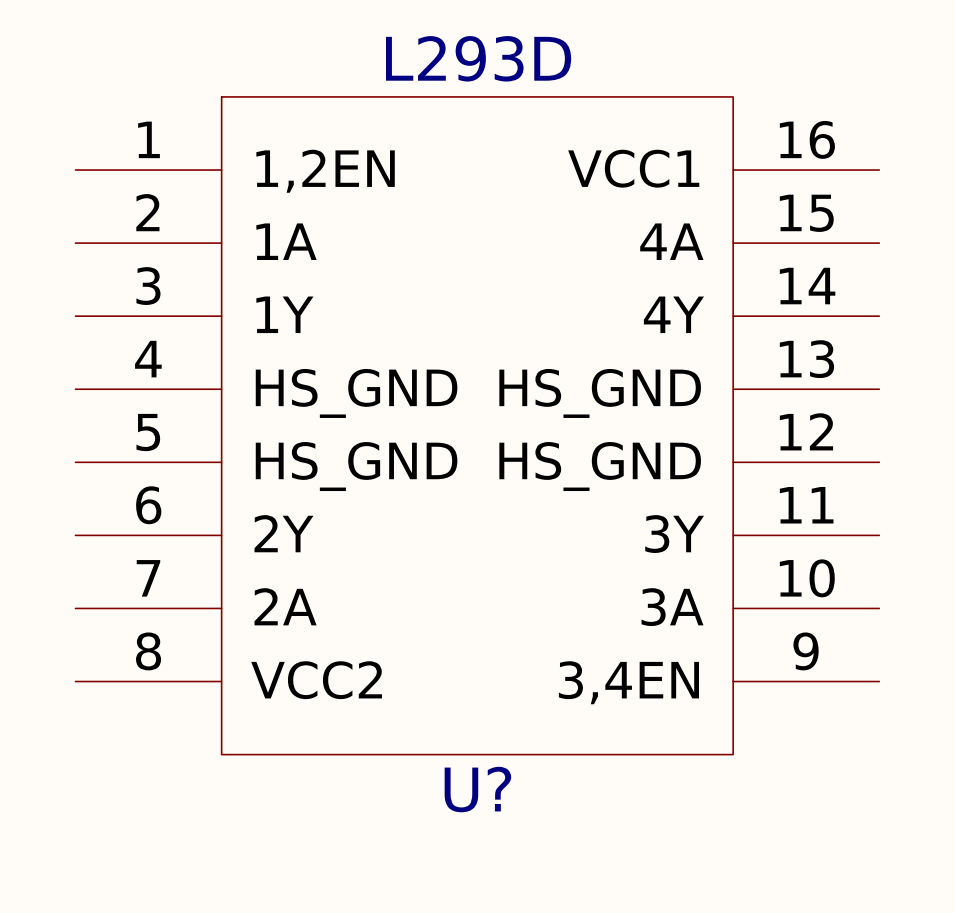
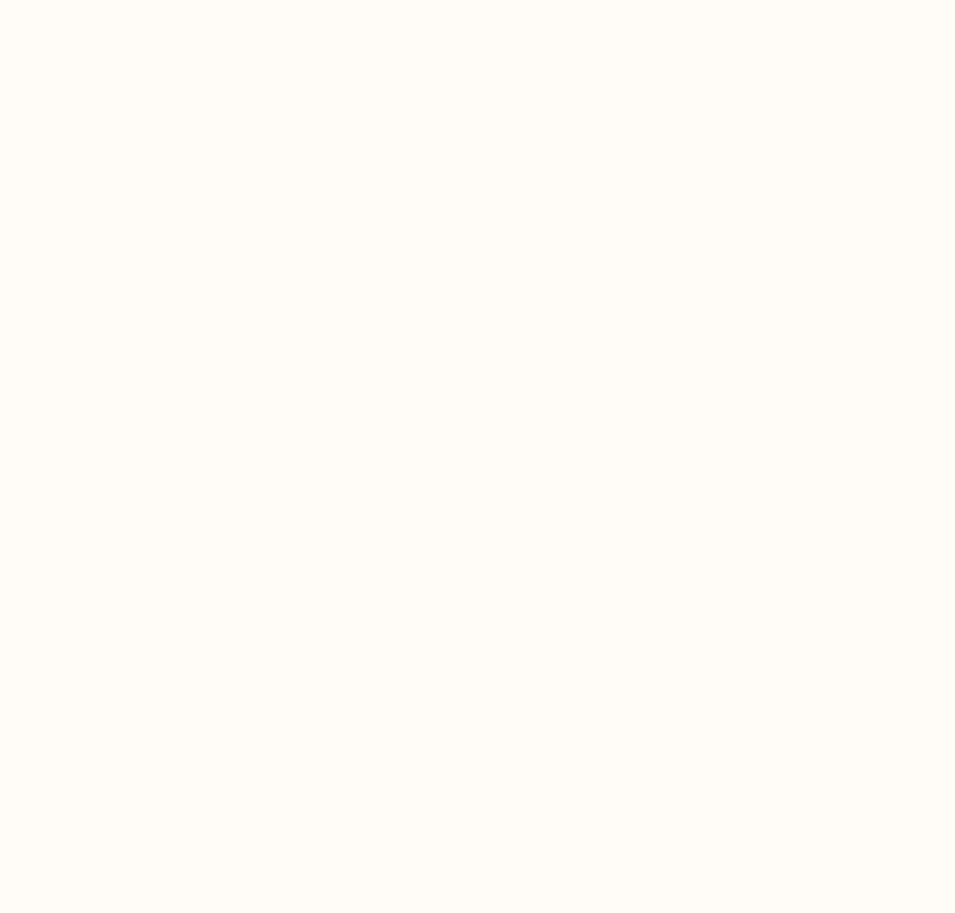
U?: L293D (477, 425) -> none

